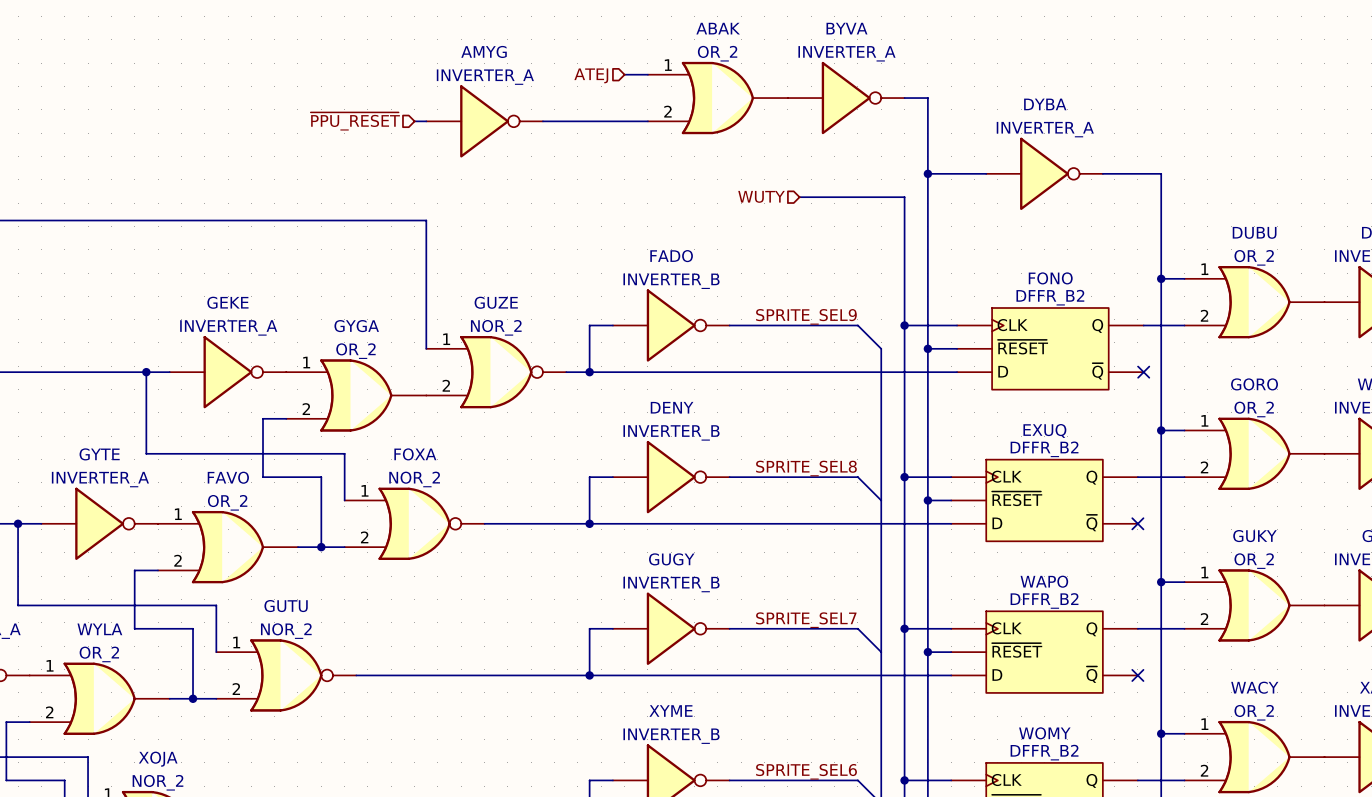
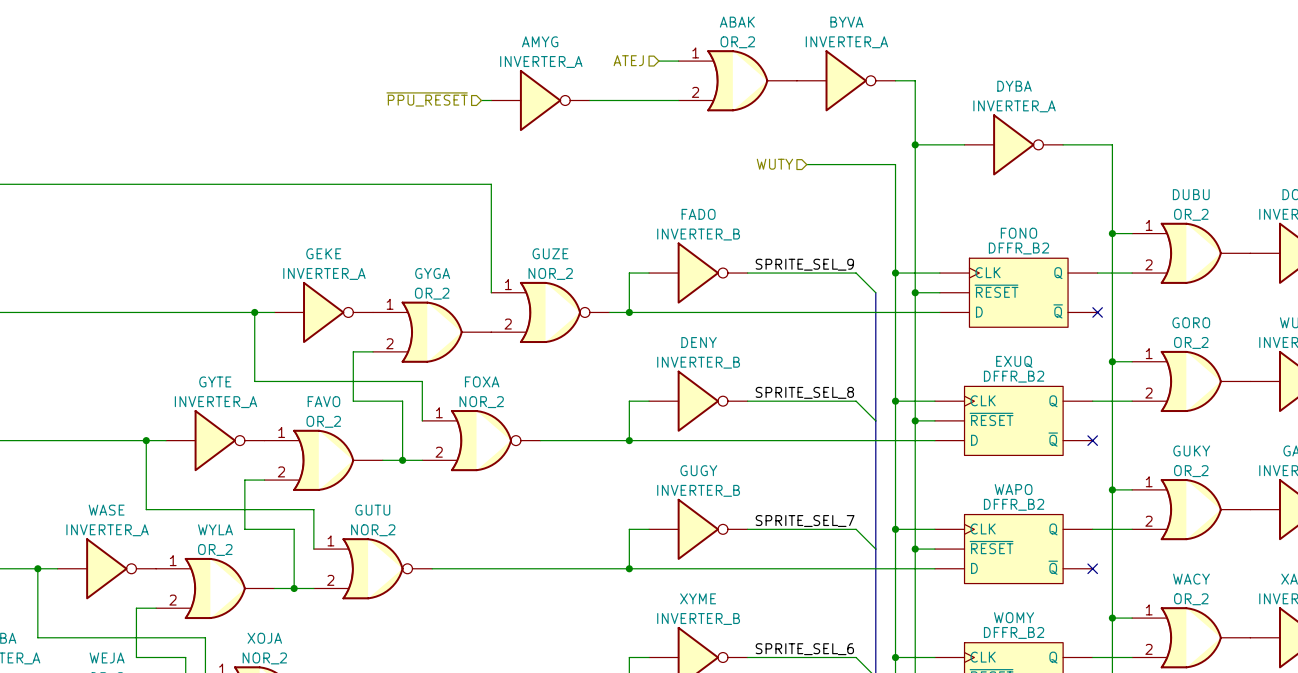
label: SPRITE_SEL9 (806, 316) -> SPRITE_SEL_9 (804, 264)
label: SPRITE_SEL8 (806, 468) -> SPRITE_SEL_8 (804, 392)
label: SPRITE_SEL7 (806, 620) -> SPRITE_SEL_7 (805, 521)
label: SPRITE_SEL6 (806, 771) -> SPRITE_SEL_6 (804, 649)

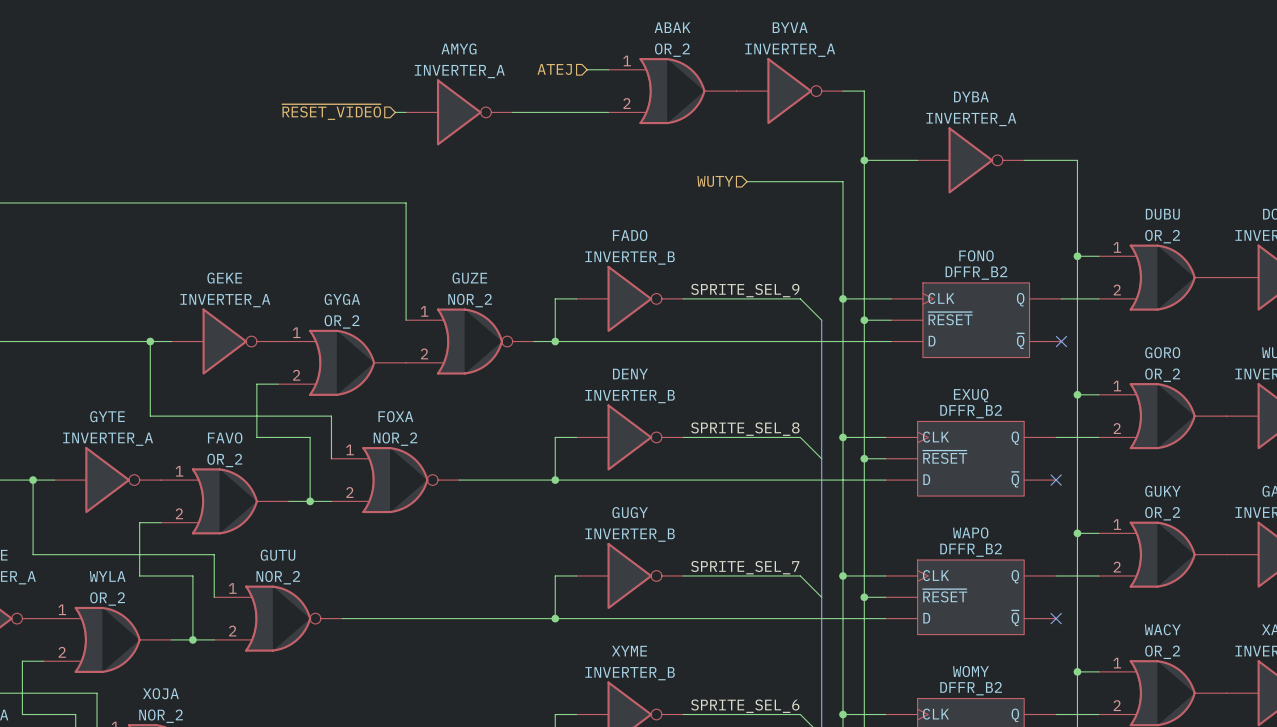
hierarchical label: ~{PPU_RESET} (427, 99) -> ~{RESET_VIDEO} (331, 112)

